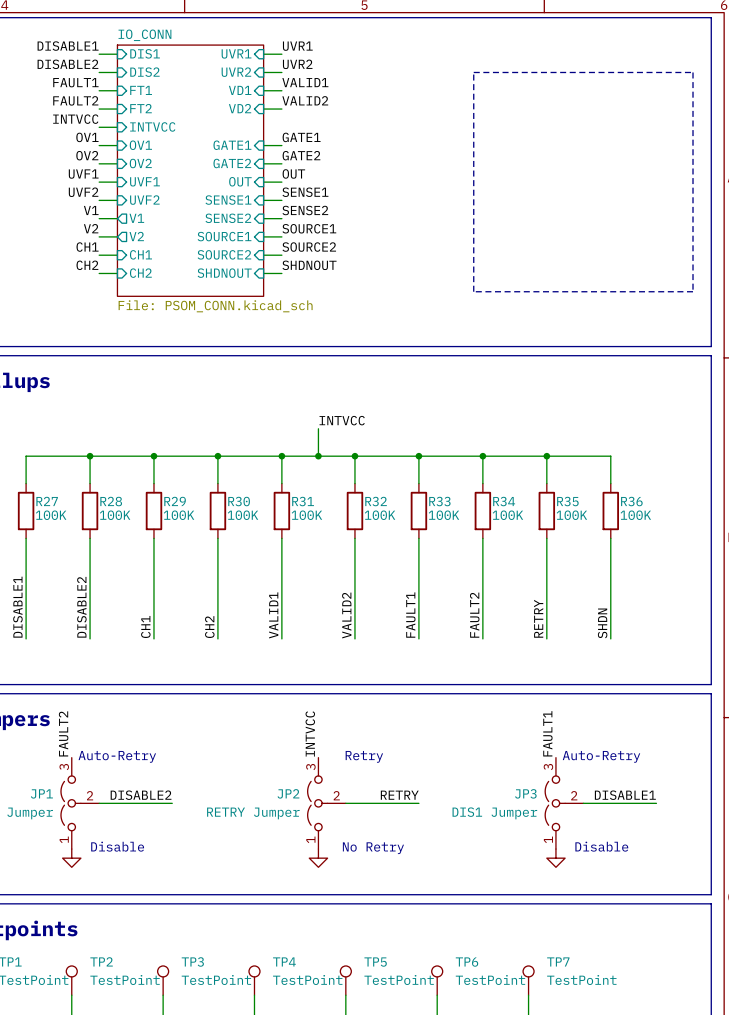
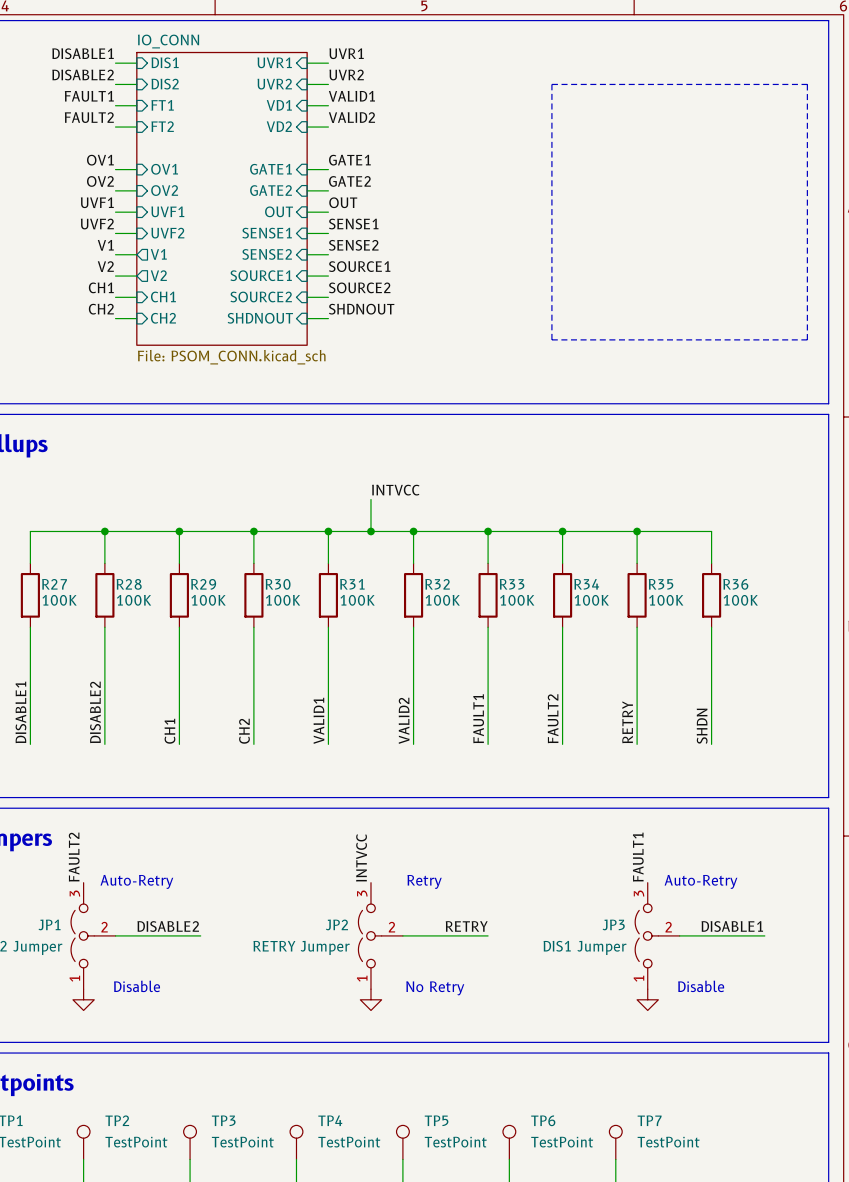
label: INTVCC (75, 119) -> none
sheet pin: INTVCC (152, 126) -> none
wire: (99, 127) (117, 127) -> none

